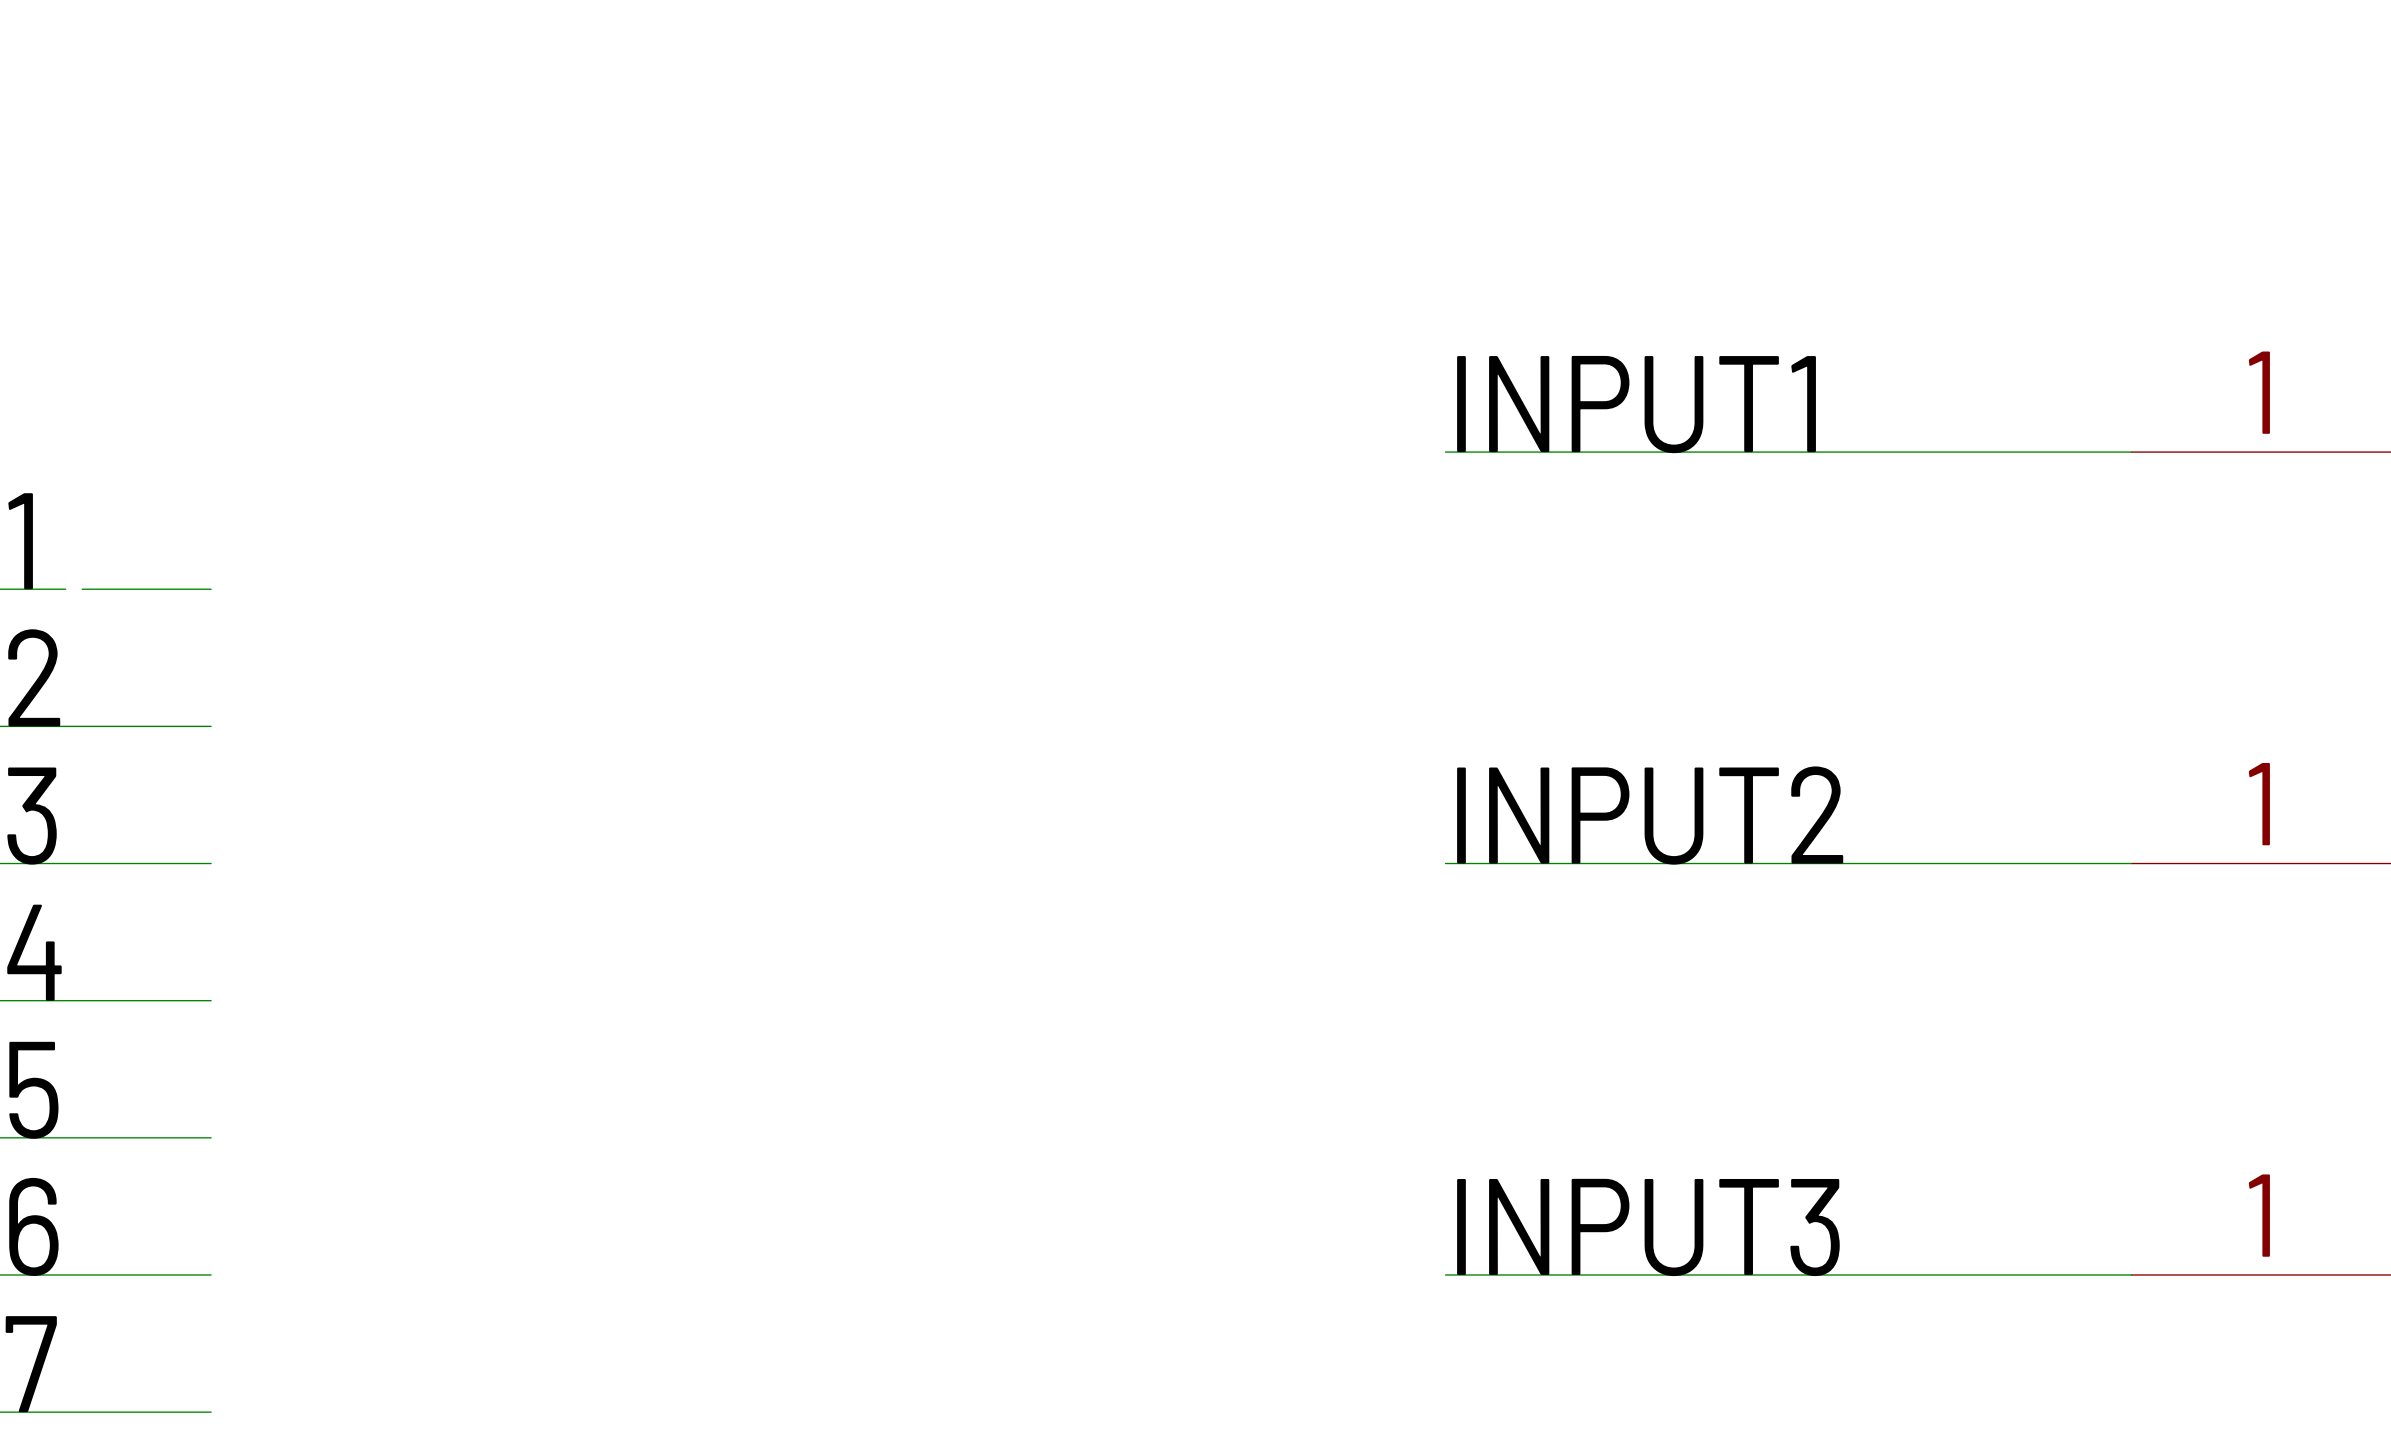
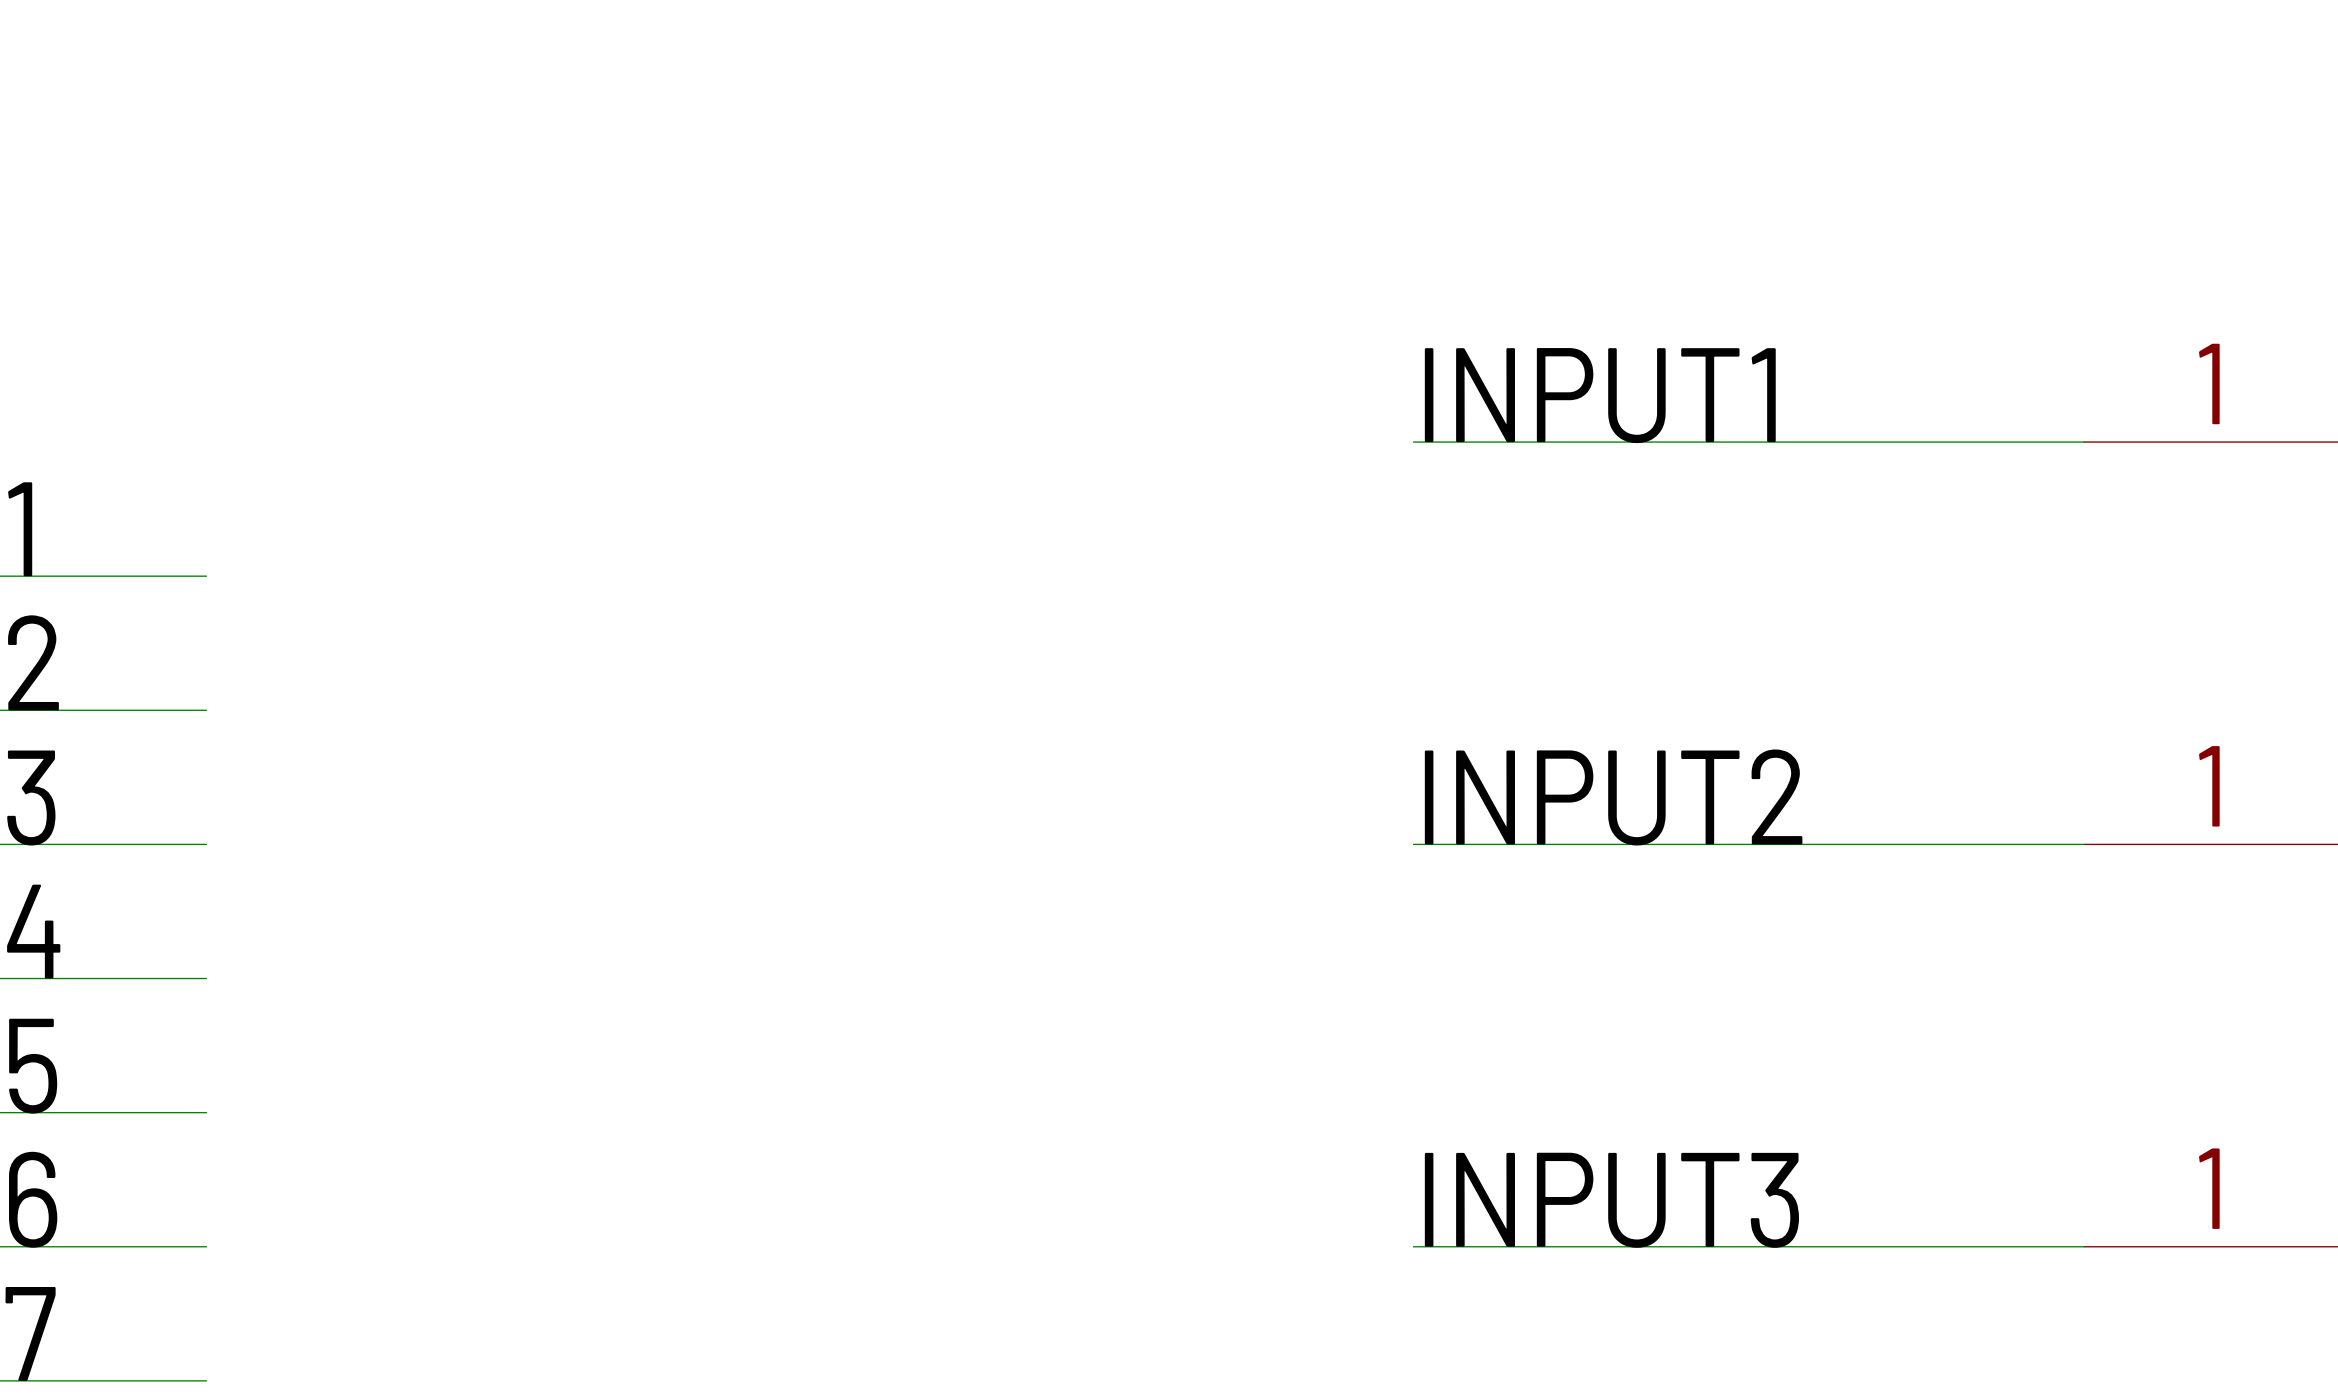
wire: none -> (64, 576) (80, 576)

